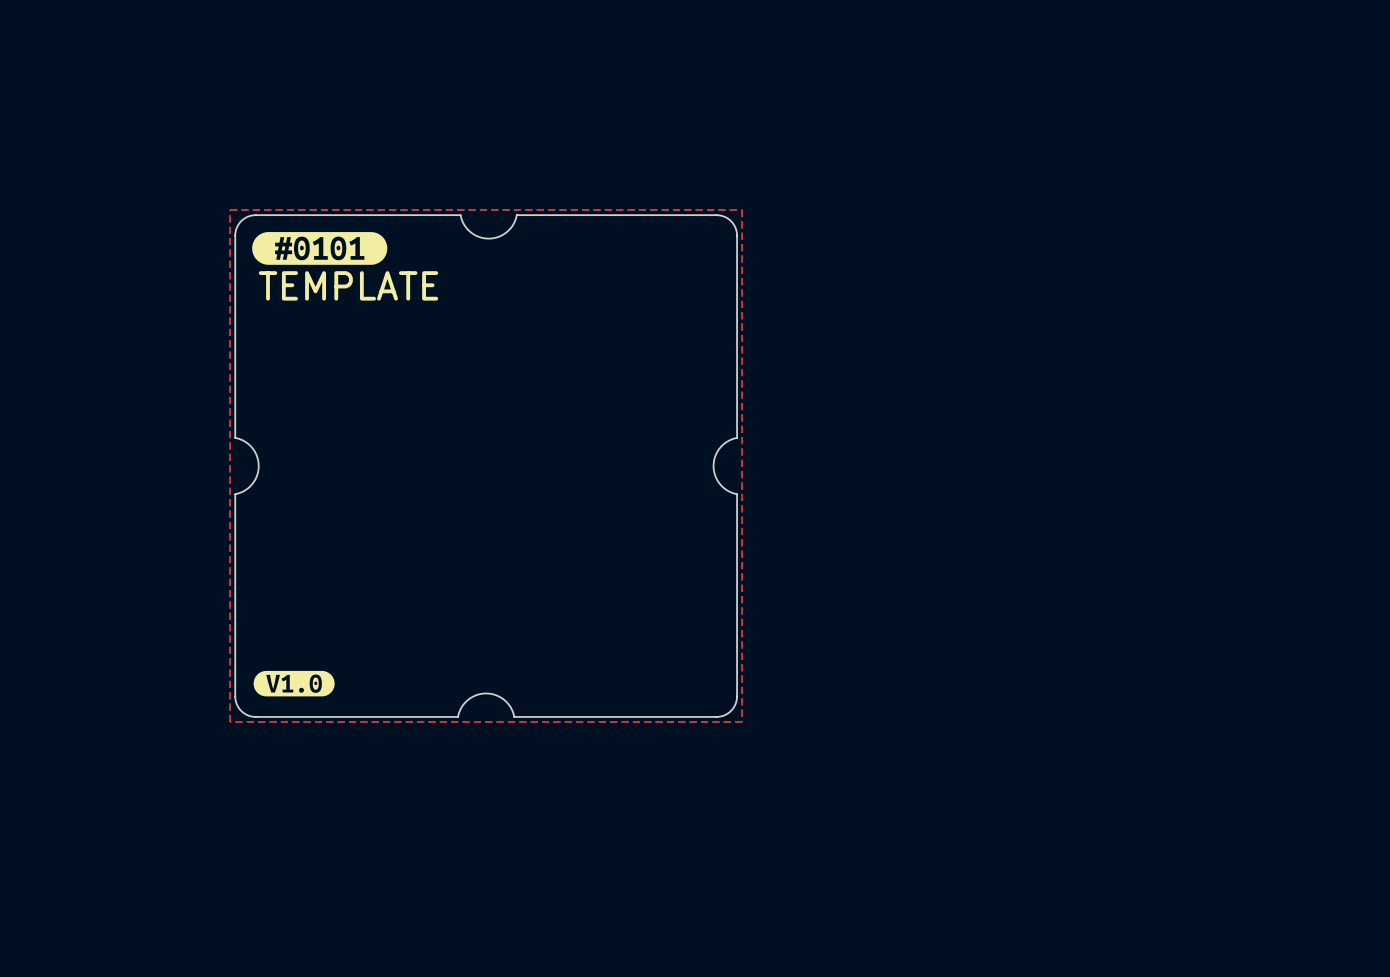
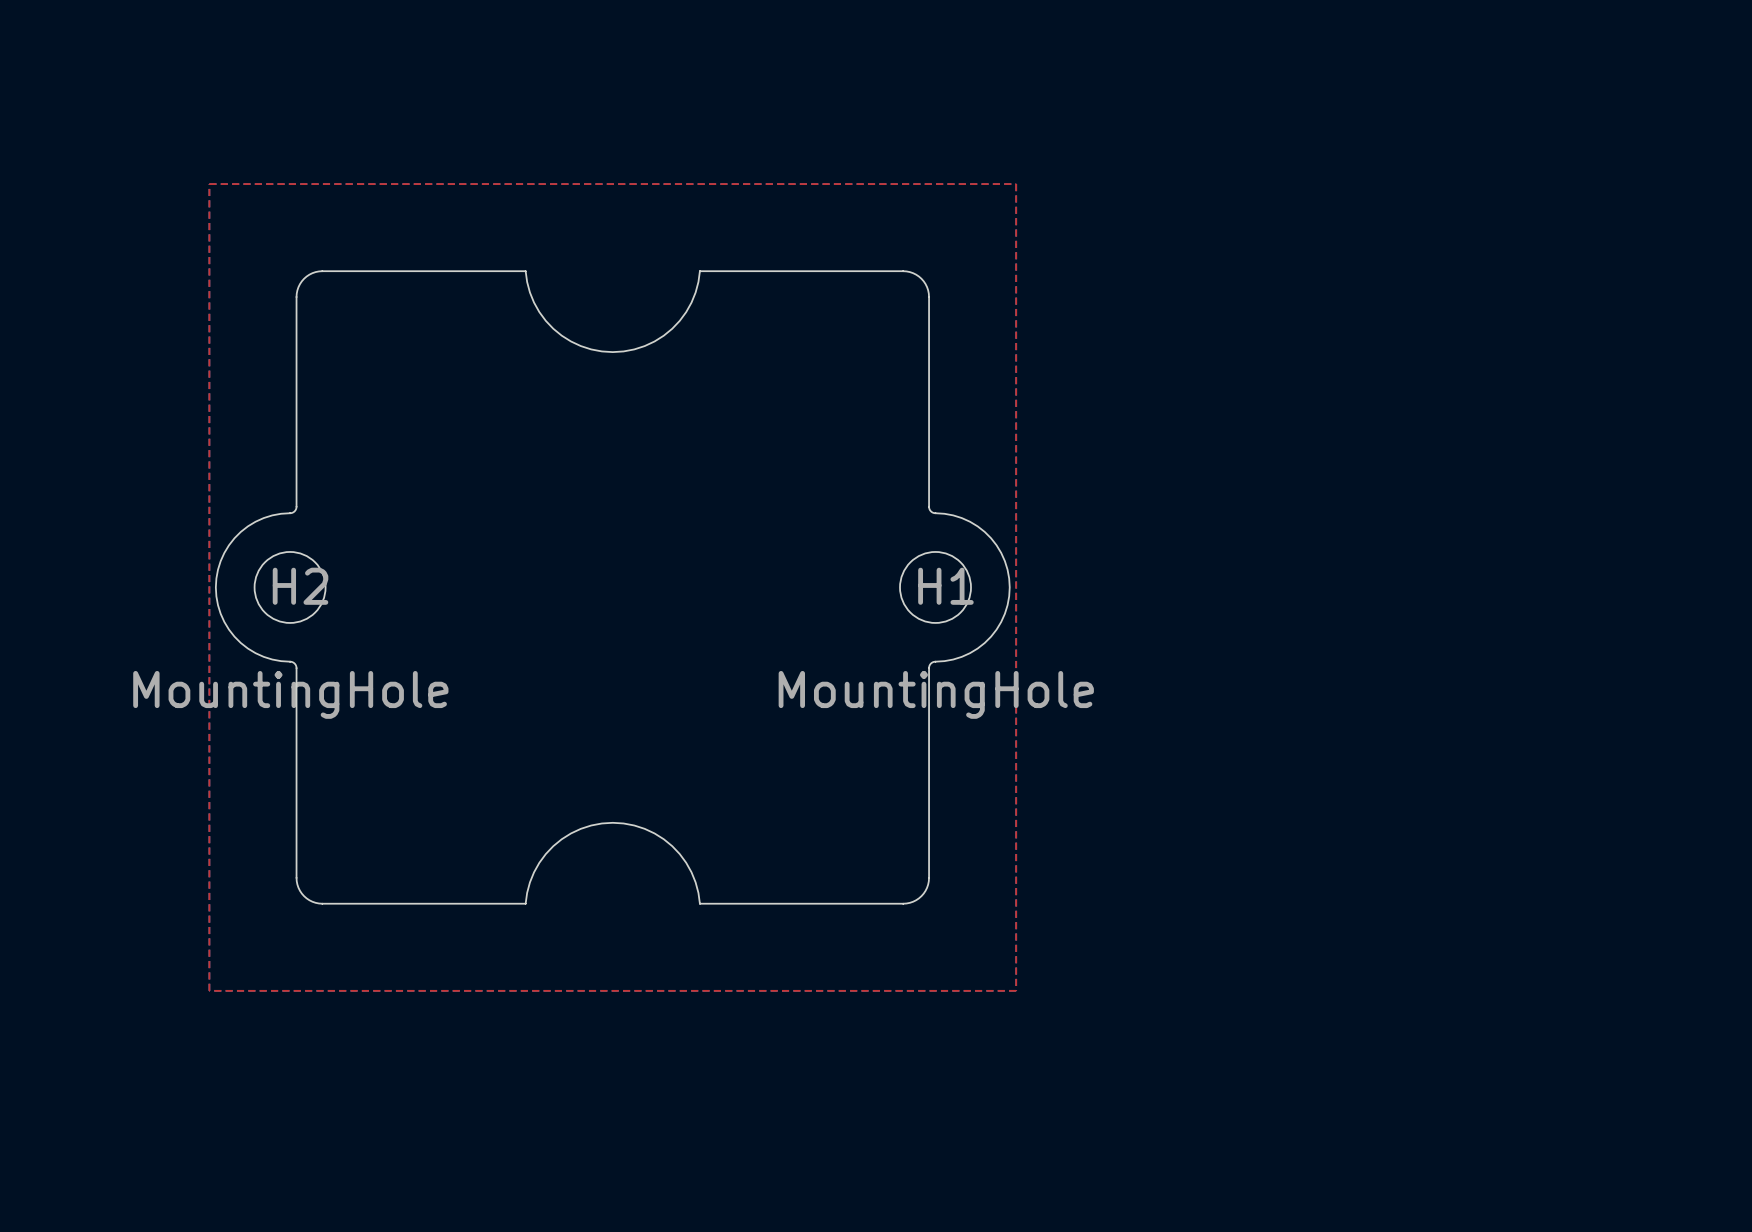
top zone outline: (230, 210) (230, 722) (742, 722) (742, 210) (230, 210) -> (209, 184) (209, 990) (1016, 990) (1016, 184) (209, 184)
board edge: (417, 215) (460, 215) (464, 225) (471, 233) (488, 238) (499, 236) (508, 230) (516, 215) (555, 215) -> (525, 271) (534, 302) (553, 328) (580, 346) (612, 352) (644, 346) (672, 328) (691, 302) (699, 271)
drawing: [252, 232, 388, 265] -> none
text: TEMPLATE (348, 285) -> none
board edge: (235, 402) (235, 437) (245, 441) (253, 449) (258, 466) (253, 482) (245, 490) (235, 494) (235, 530) -> (296, 506) (292, 512) (272, 515) (255, 521) (234, 538) (220, 561) (215, 587) (220, 613) (234, 636) (255, 653) (272, 659) (292, 662) (296, 668)
board edge: (737, 402) (737, 437) (726, 441) (719, 449) (713, 466) (719, 482) (726, 490) (737, 494) (737, 530) -> (929, 506) (933, 512) (953, 515) (969, 521) (991, 538) (1004, 561) (1009, 587) (1004, 613) (996, 629) (984, 643) (961, 656) (933, 662) (929, 668)
H2: none -> MountingHole (290, 587)
H1: none -> MountingHole (935, 587)
drawing: [253, 670, 335, 697] -> none
board edge: (417, 716) (457, 716) (461, 706) (469, 698) (486, 693) (503, 698) (510, 706) (514, 716) (555, 716) -> (525, 903) (534, 872) (553, 846) (580, 828) (612, 822) (644, 828) (672, 846) (691, 872) (699, 903)

